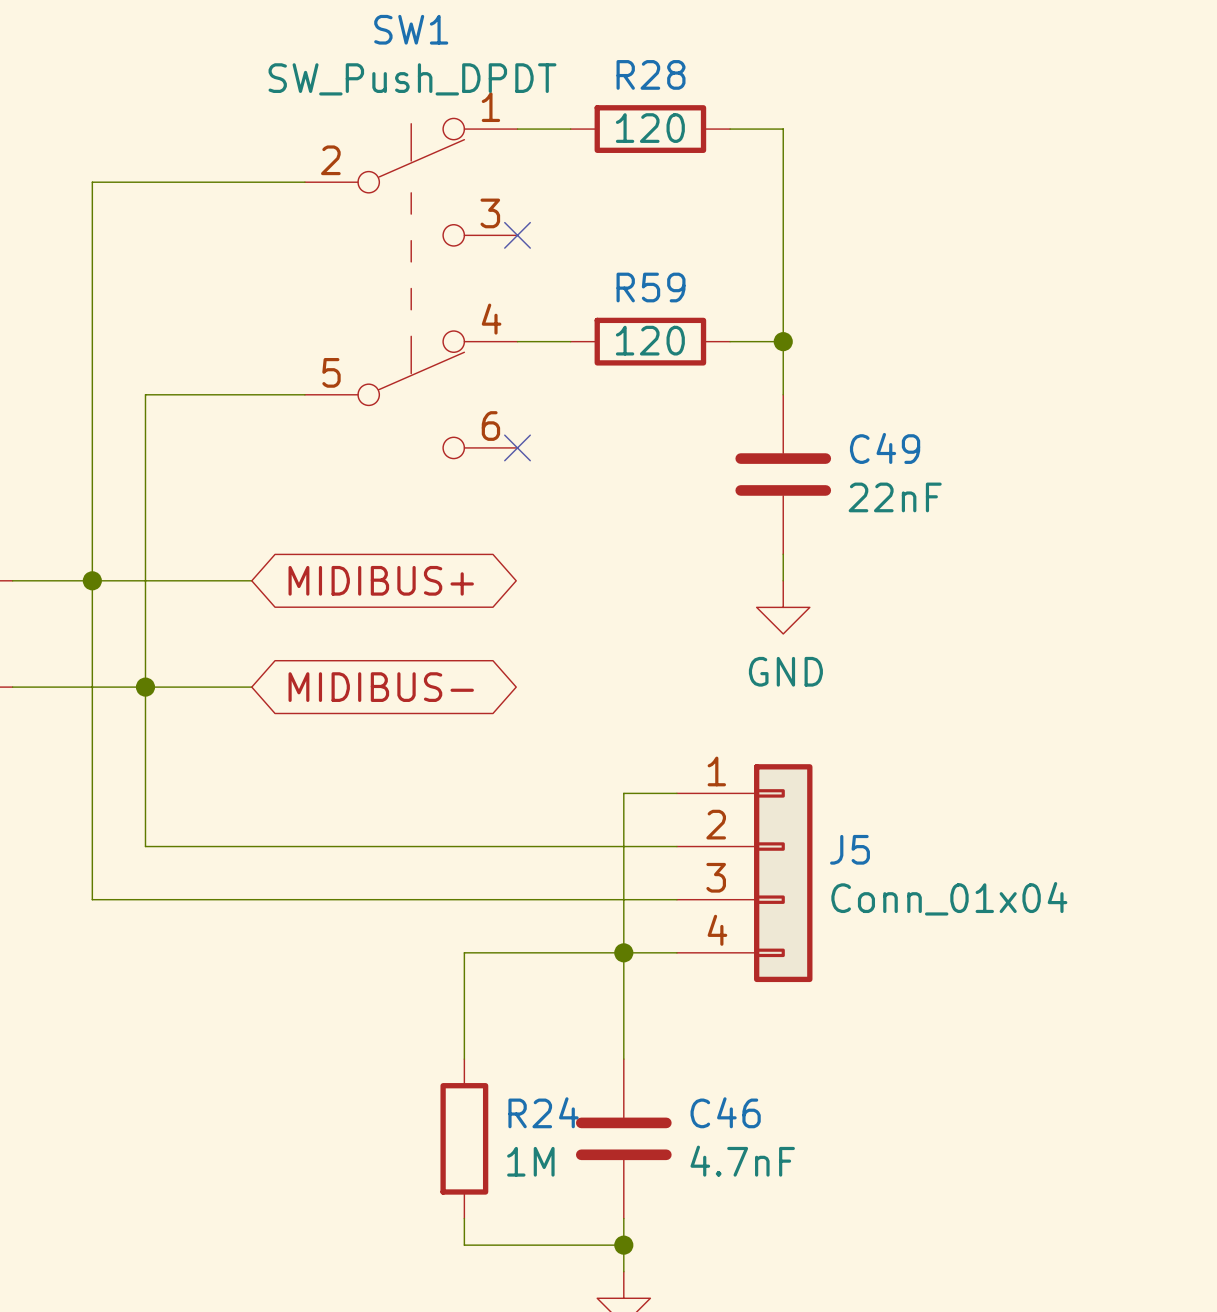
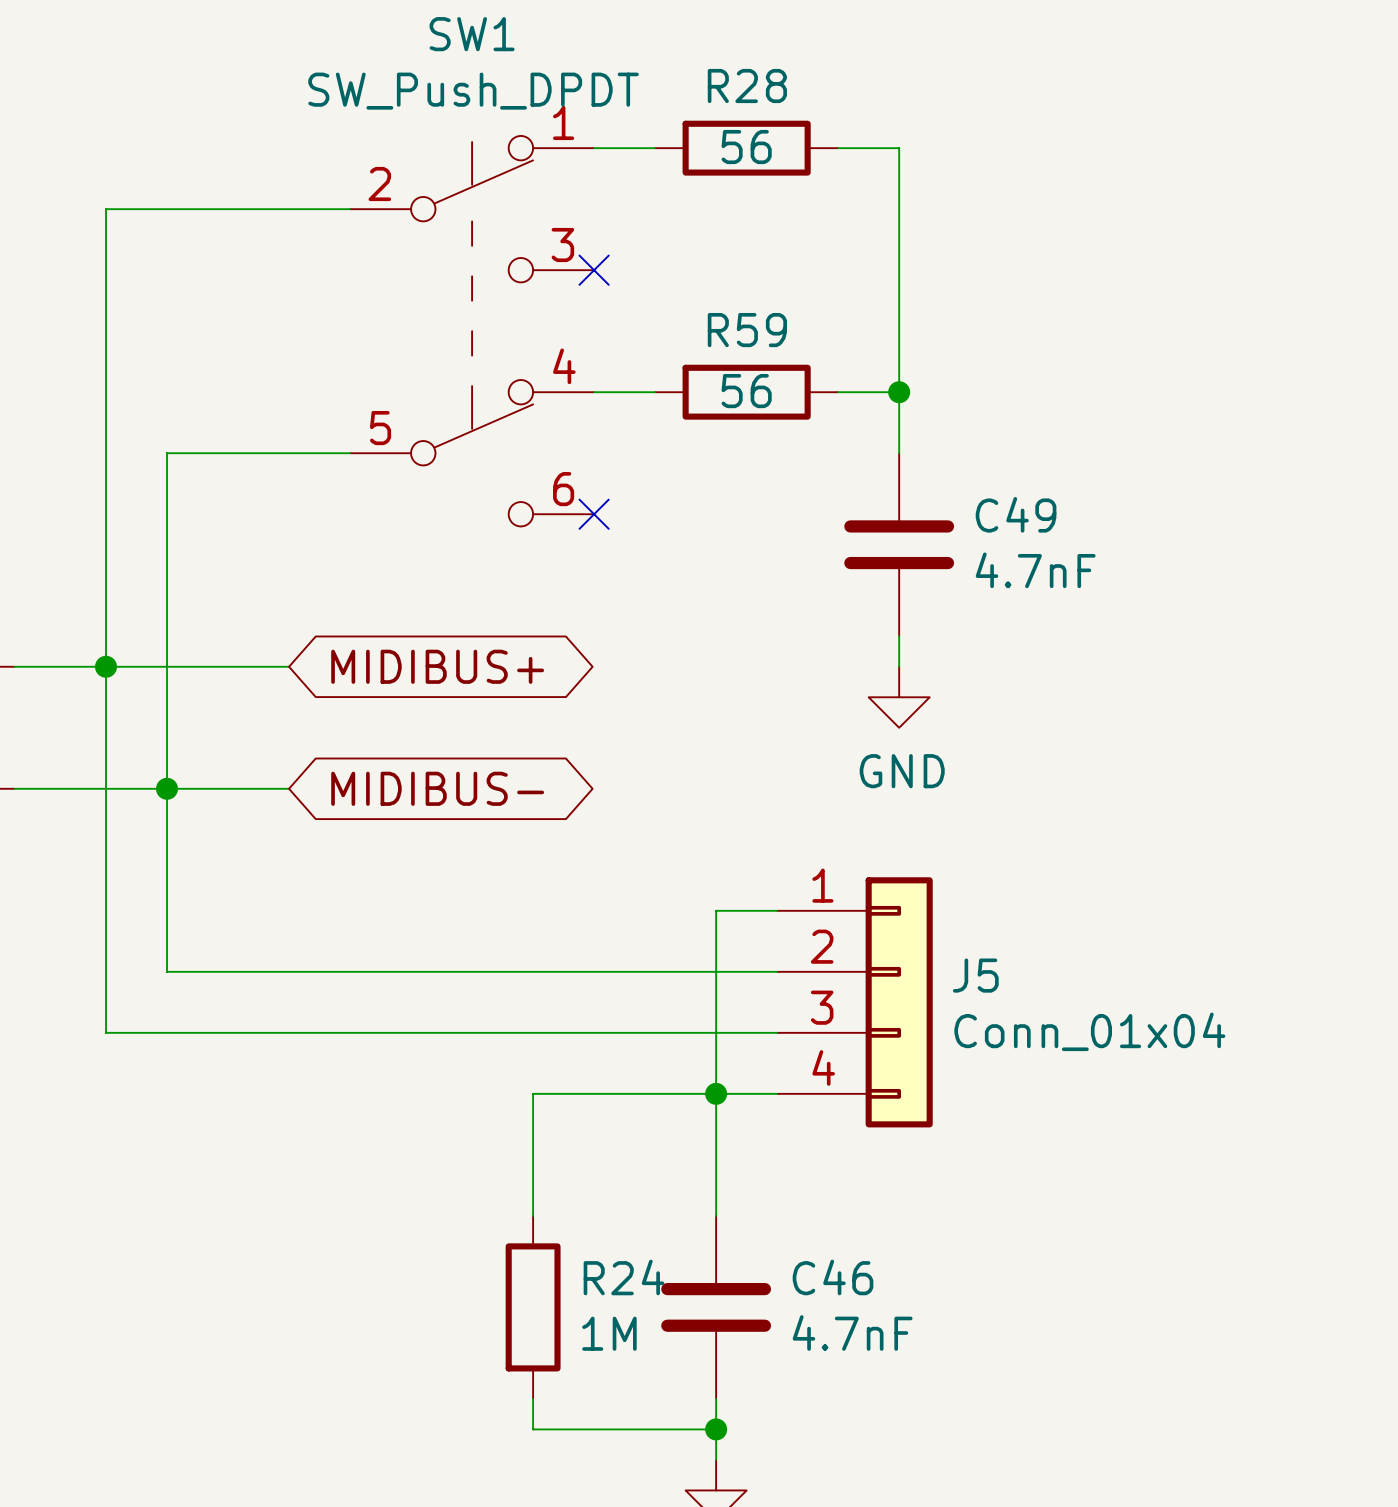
R28 value: 120 (650, 128) -> 56 (746, 147)
R59 value: 120 (650, 340) -> 56 (746, 391)
C49 value: 22nF (895, 497) -> 4.7nF (1035, 570)

